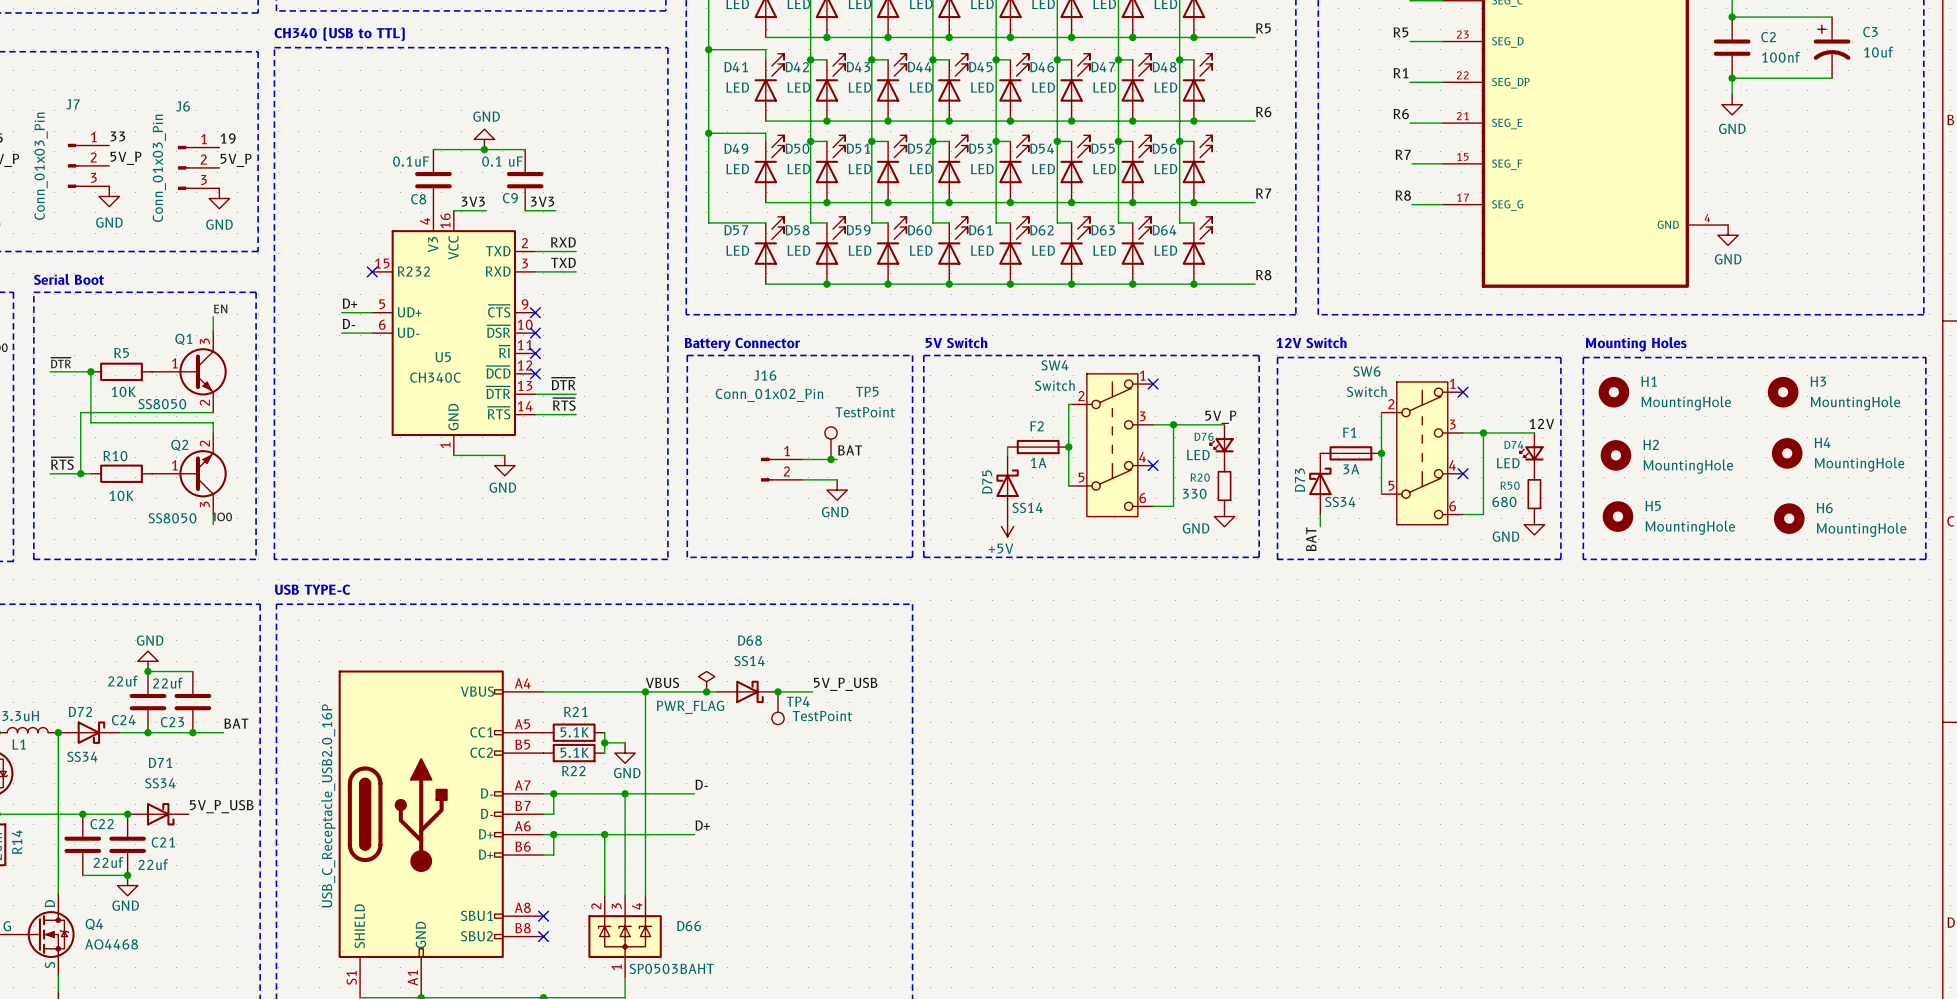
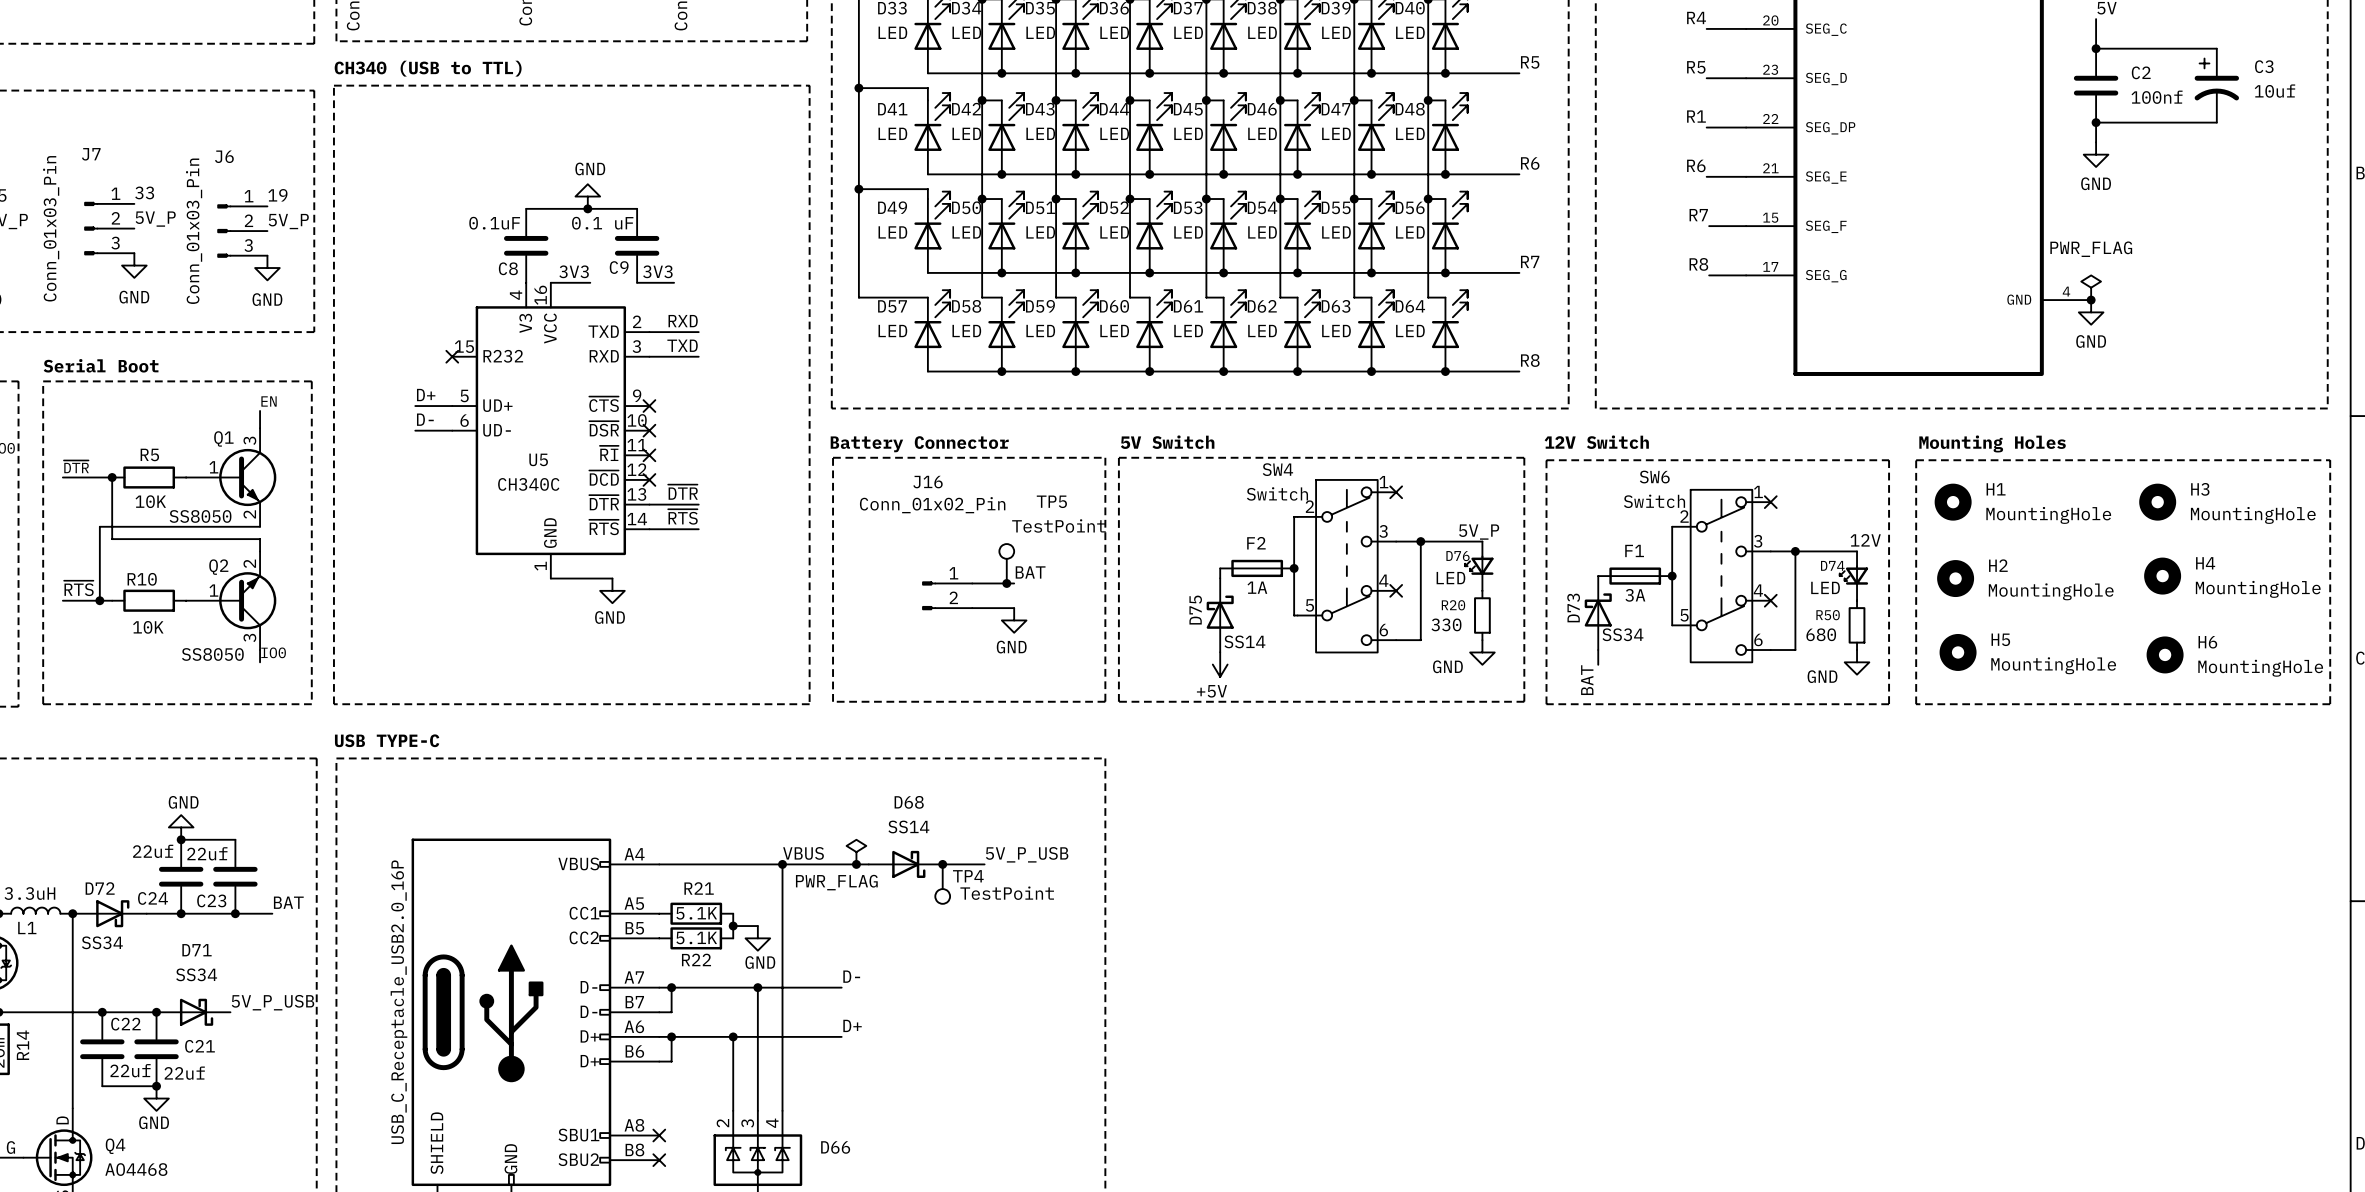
power symbol: none -> PWR_FLAG (2091, 287)
junction: none -> (2091, 300)

